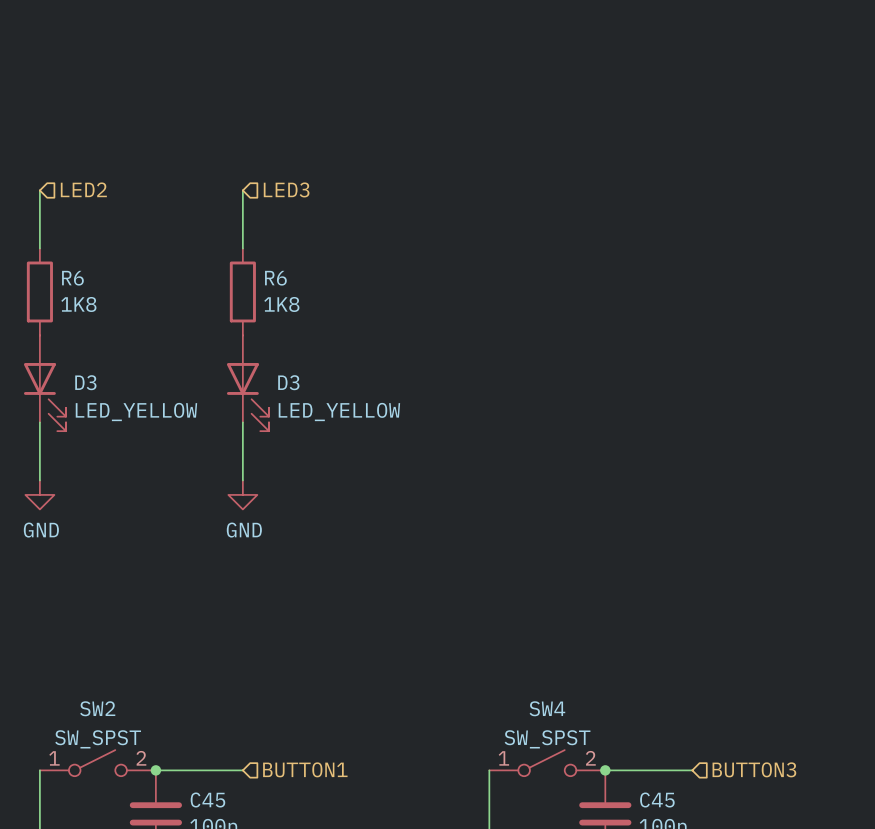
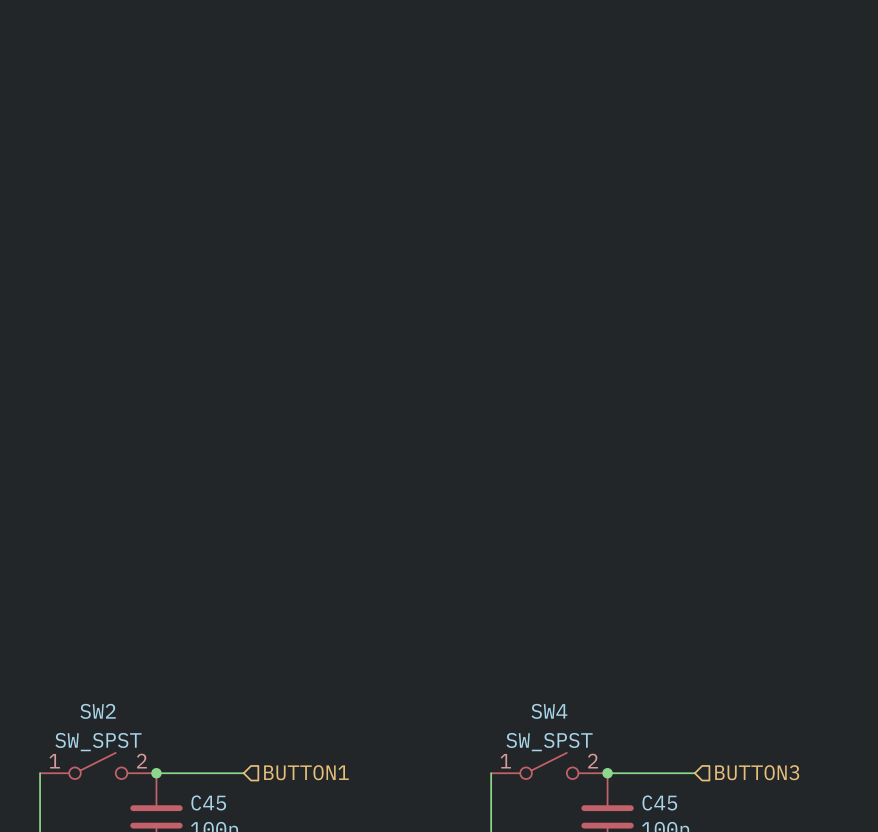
hierarchical label: LED2 (83, 189) -> none
hierarchical label: LED3 (286, 189) -> none
wire: (39, 190) (39, 248) -> none
wire: (242, 190) (242, 248) -> none
R6: 1K8 (39, 291) -> none
R6: 1K8 (242, 291) -> none
D3: LED_YELLOW (44, 383) -> none
D3: LED_YELLOW (247, 383) -> none
wire: (39, 422) (39, 480) -> none
wire: (242, 422) (242, 480) -> none
power symbol: GND (39, 494) -> none
power symbol: GND (242, 494) -> none

